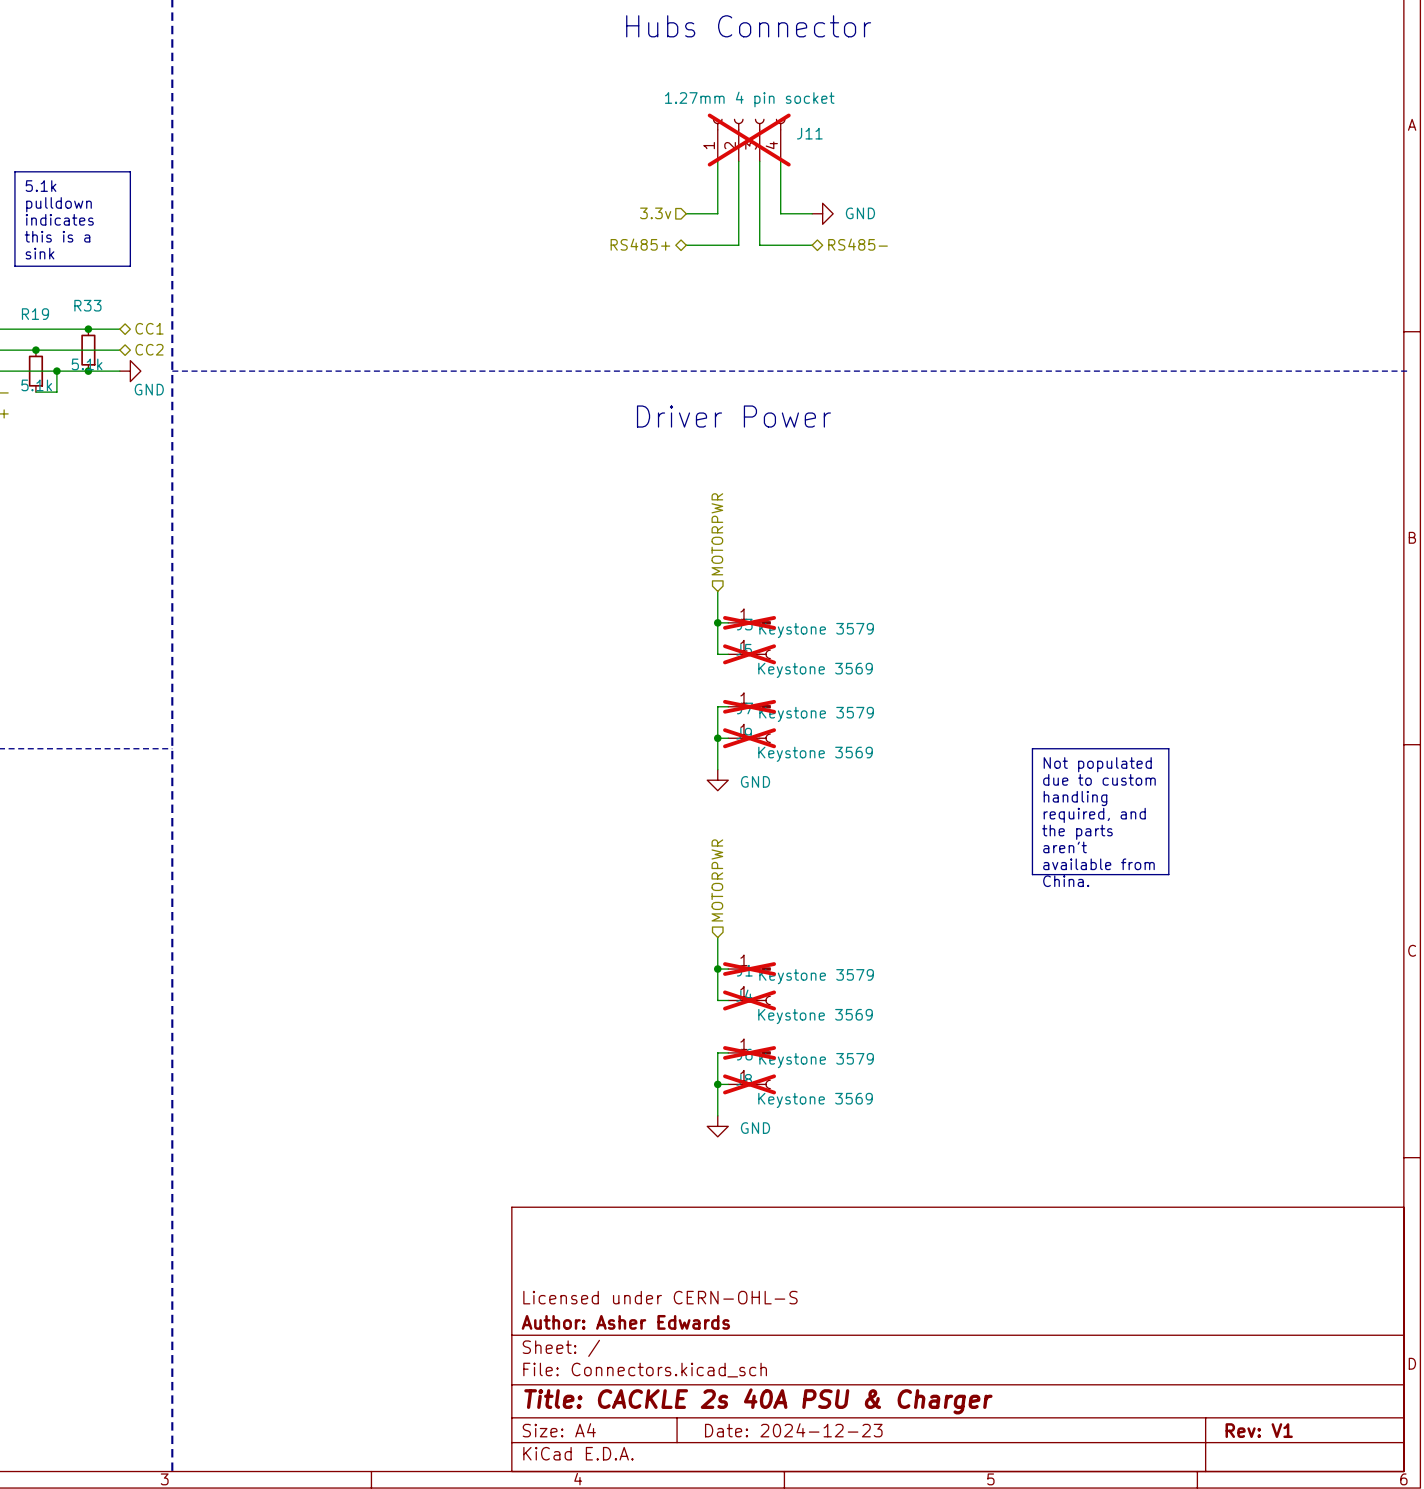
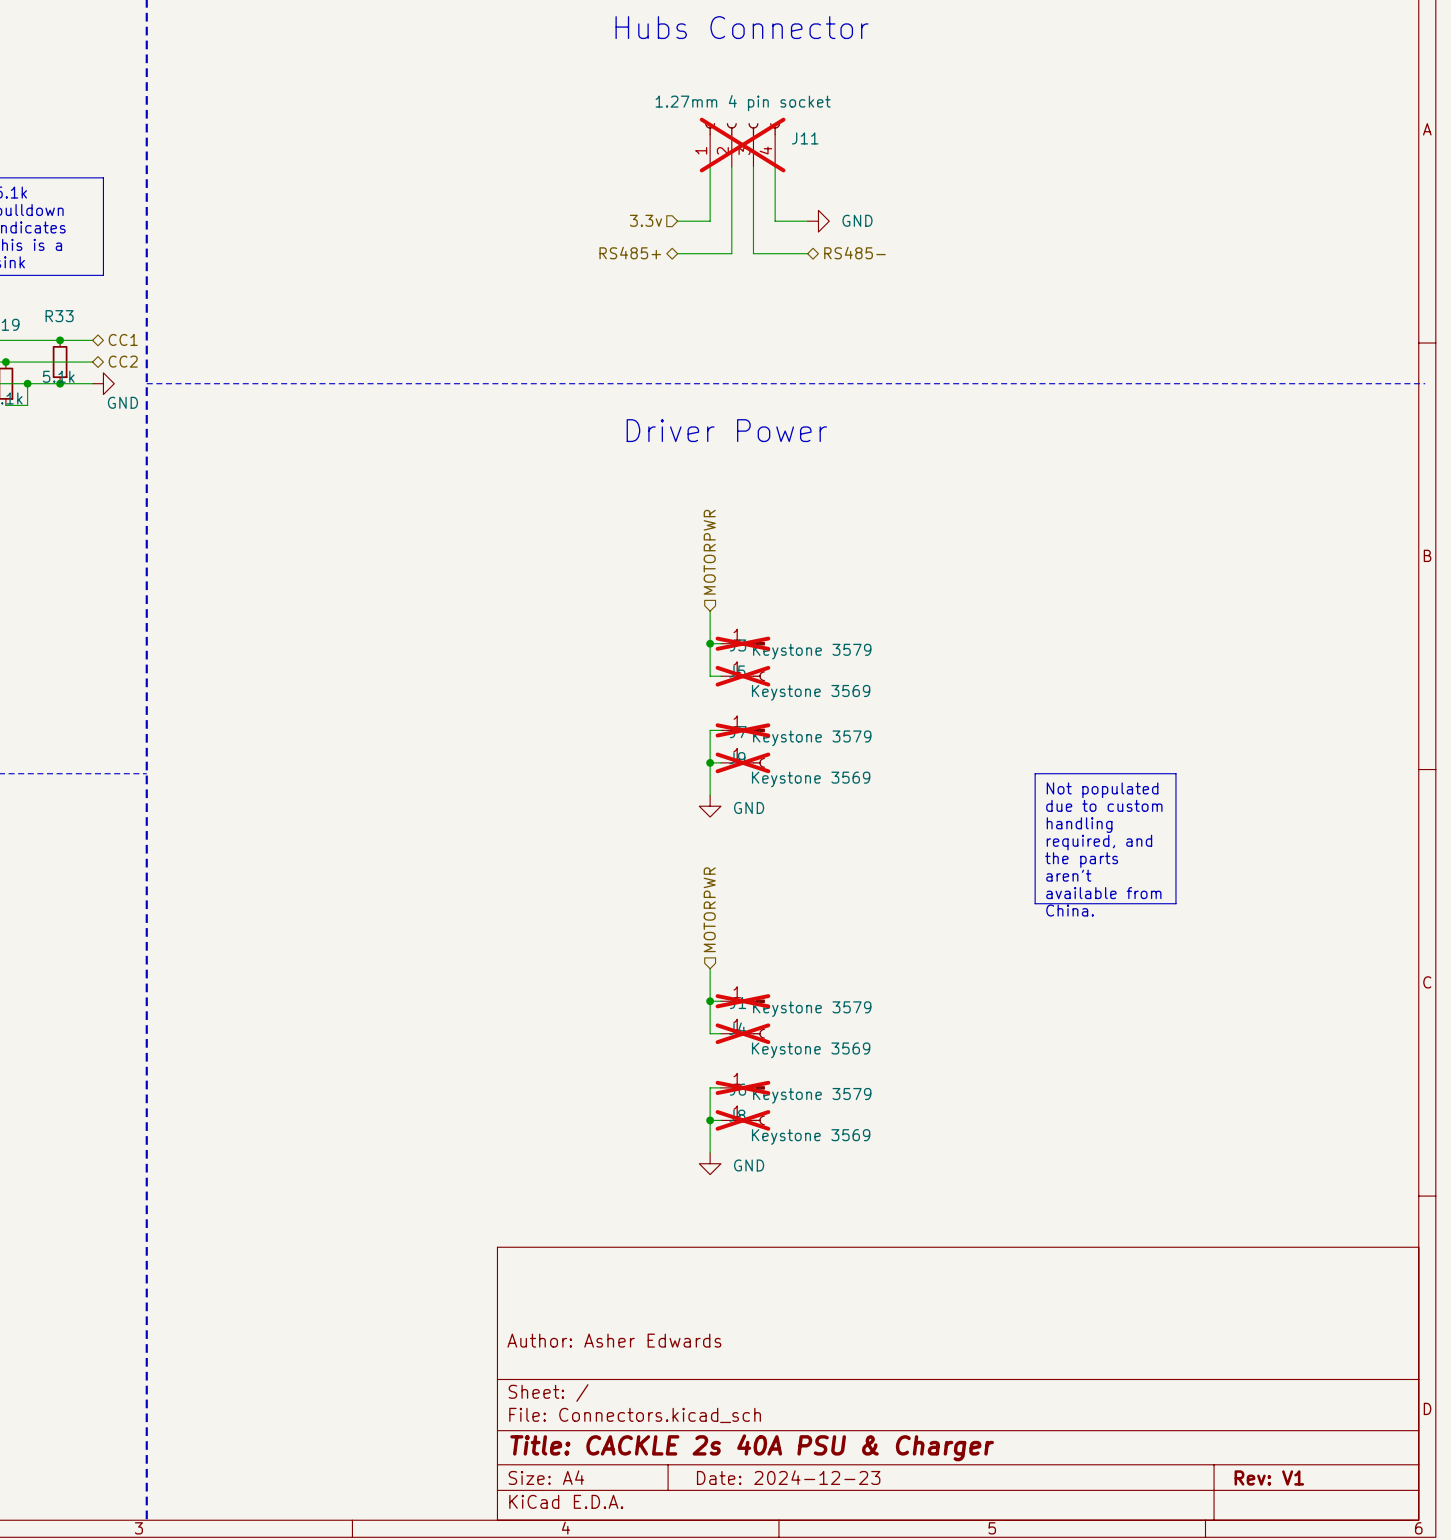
title block: Licensed under CERN-OHL-S (660, 1297) -> Author: Asher Edwards (614, 1340)
title block: Author: Asher Edwards (625, 1322) -> none

